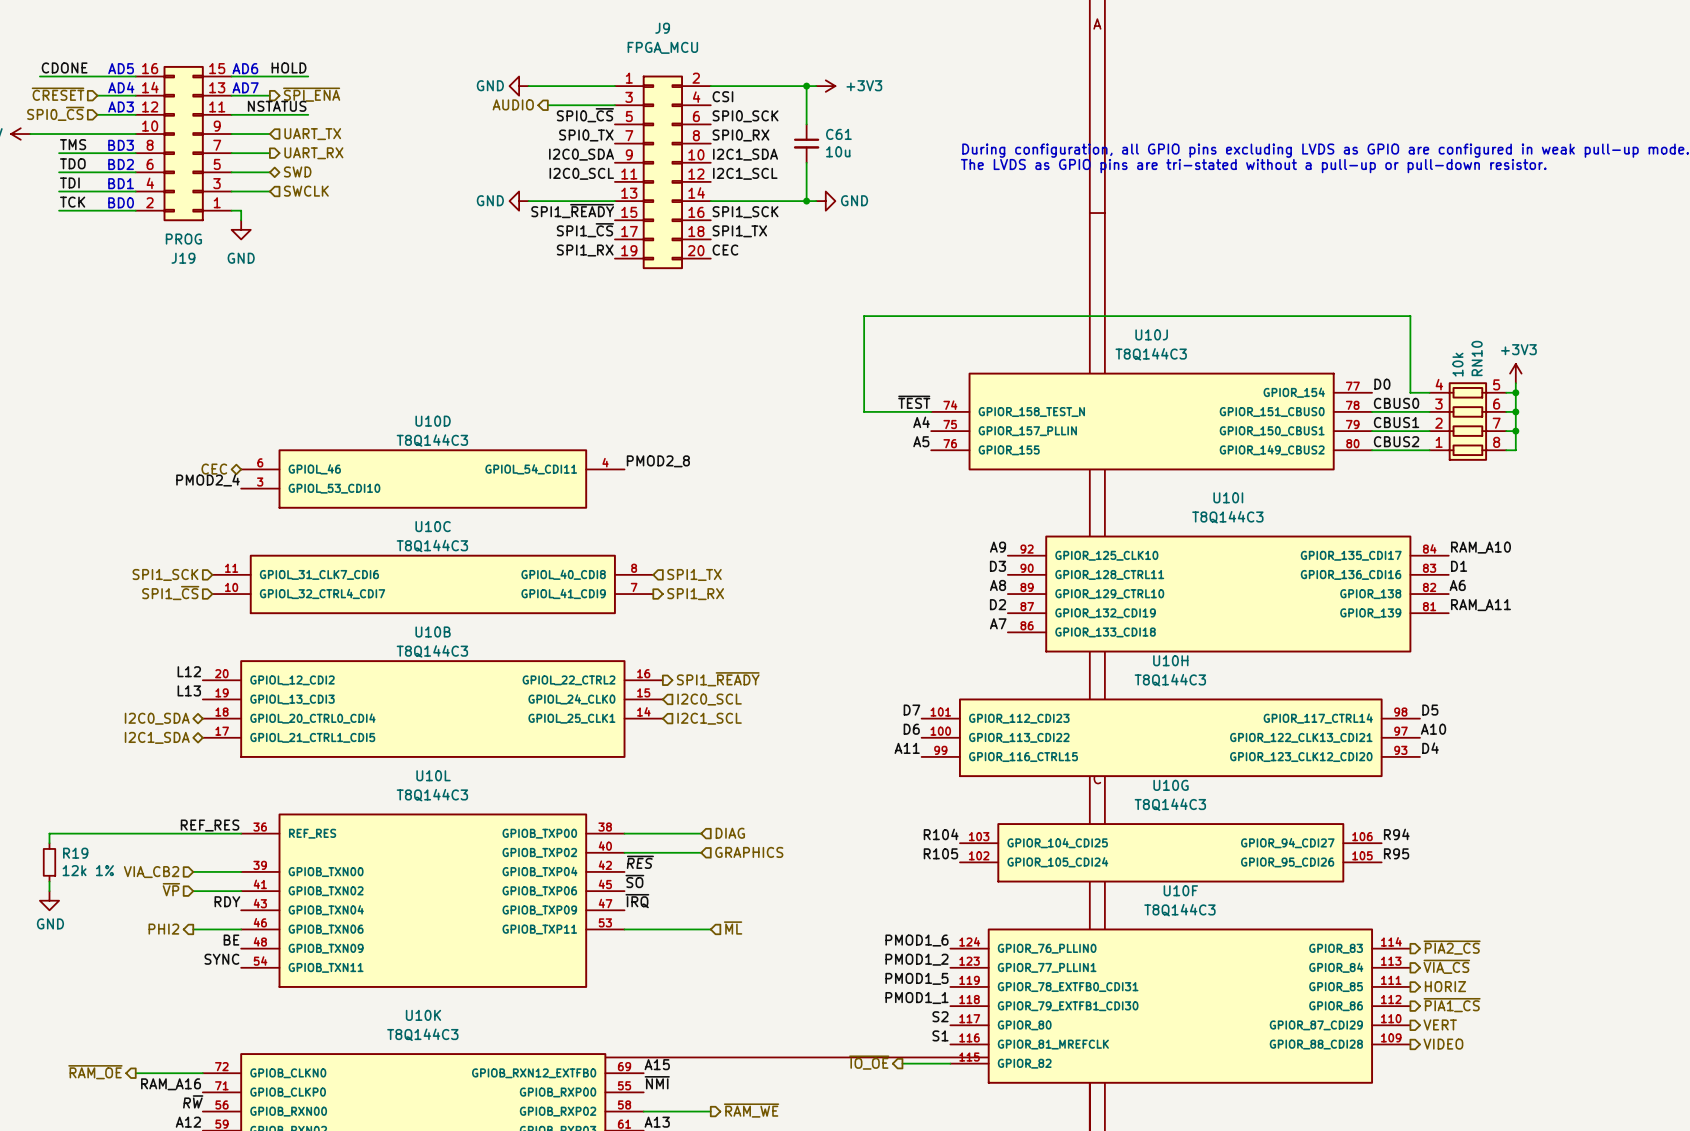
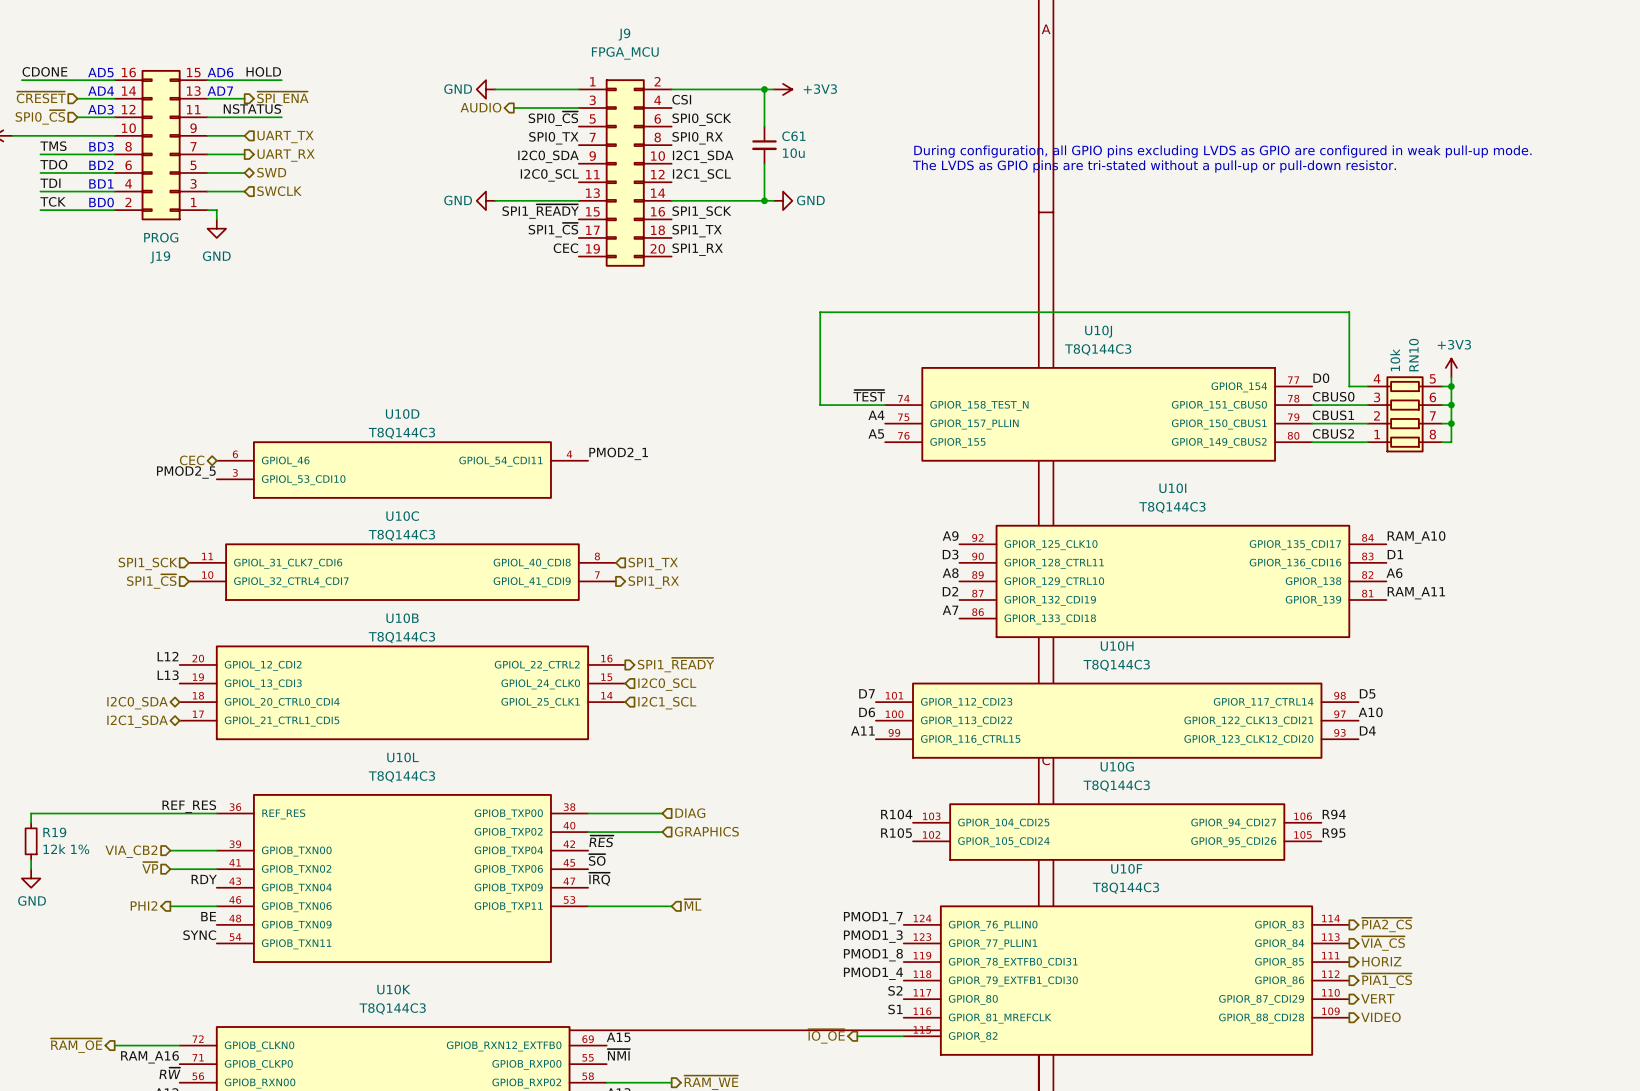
label: SPI1_RX (585, 250) -> CEC (565, 248)
label: CEC (725, 250) -> SPI1_RX (697, 249)
label: PMOD2_8 (658, 461) -> PMOD2_1 (618, 453)
label: PMOD2_4 (208, 480) -> PMOD2_5 (186, 472)
label: PMOD1_6 (916, 940) -> PMOD1_7 (873, 918)
label: PMOD1_2 (916, 959) -> PMOD1_3 (873, 936)
label: PMOD1_5 (916, 978) -> PMOD1_8 (873, 955)
label: PMOD1_1 (916, 998) -> PMOD1_4 (873, 973)

